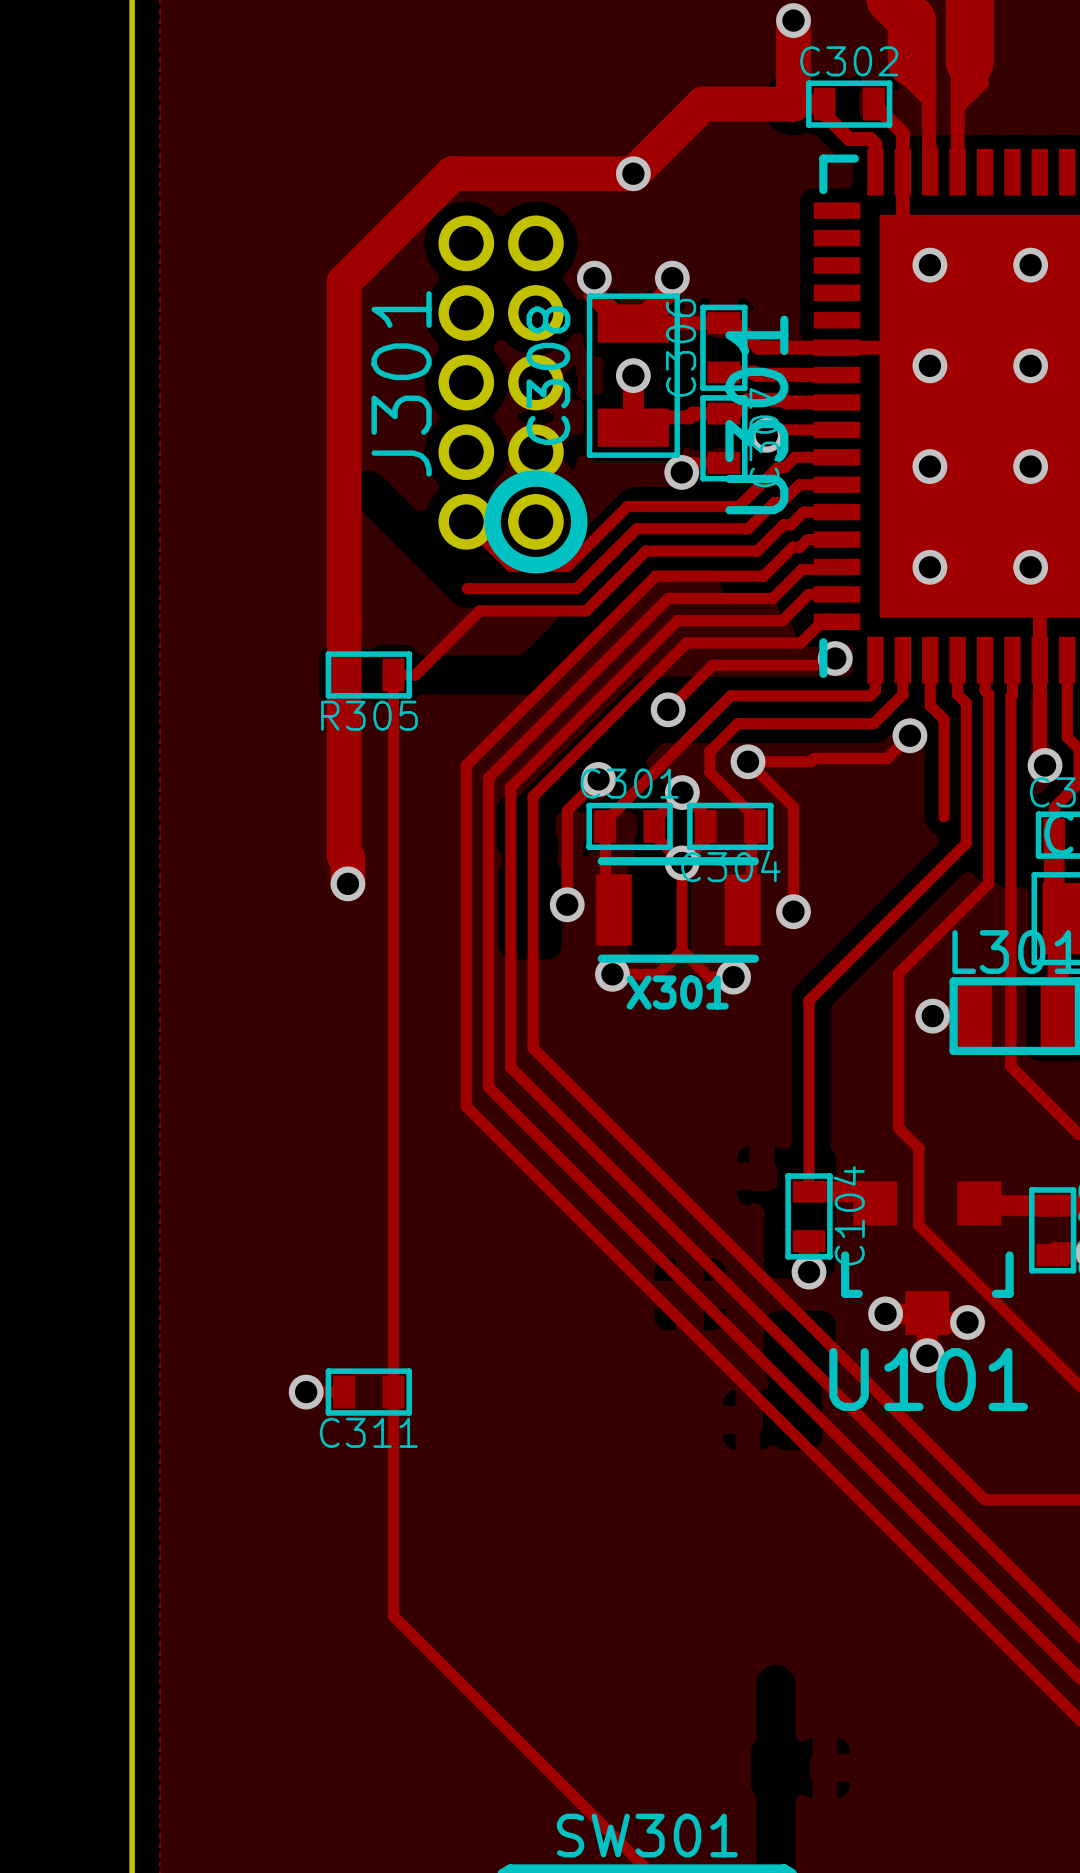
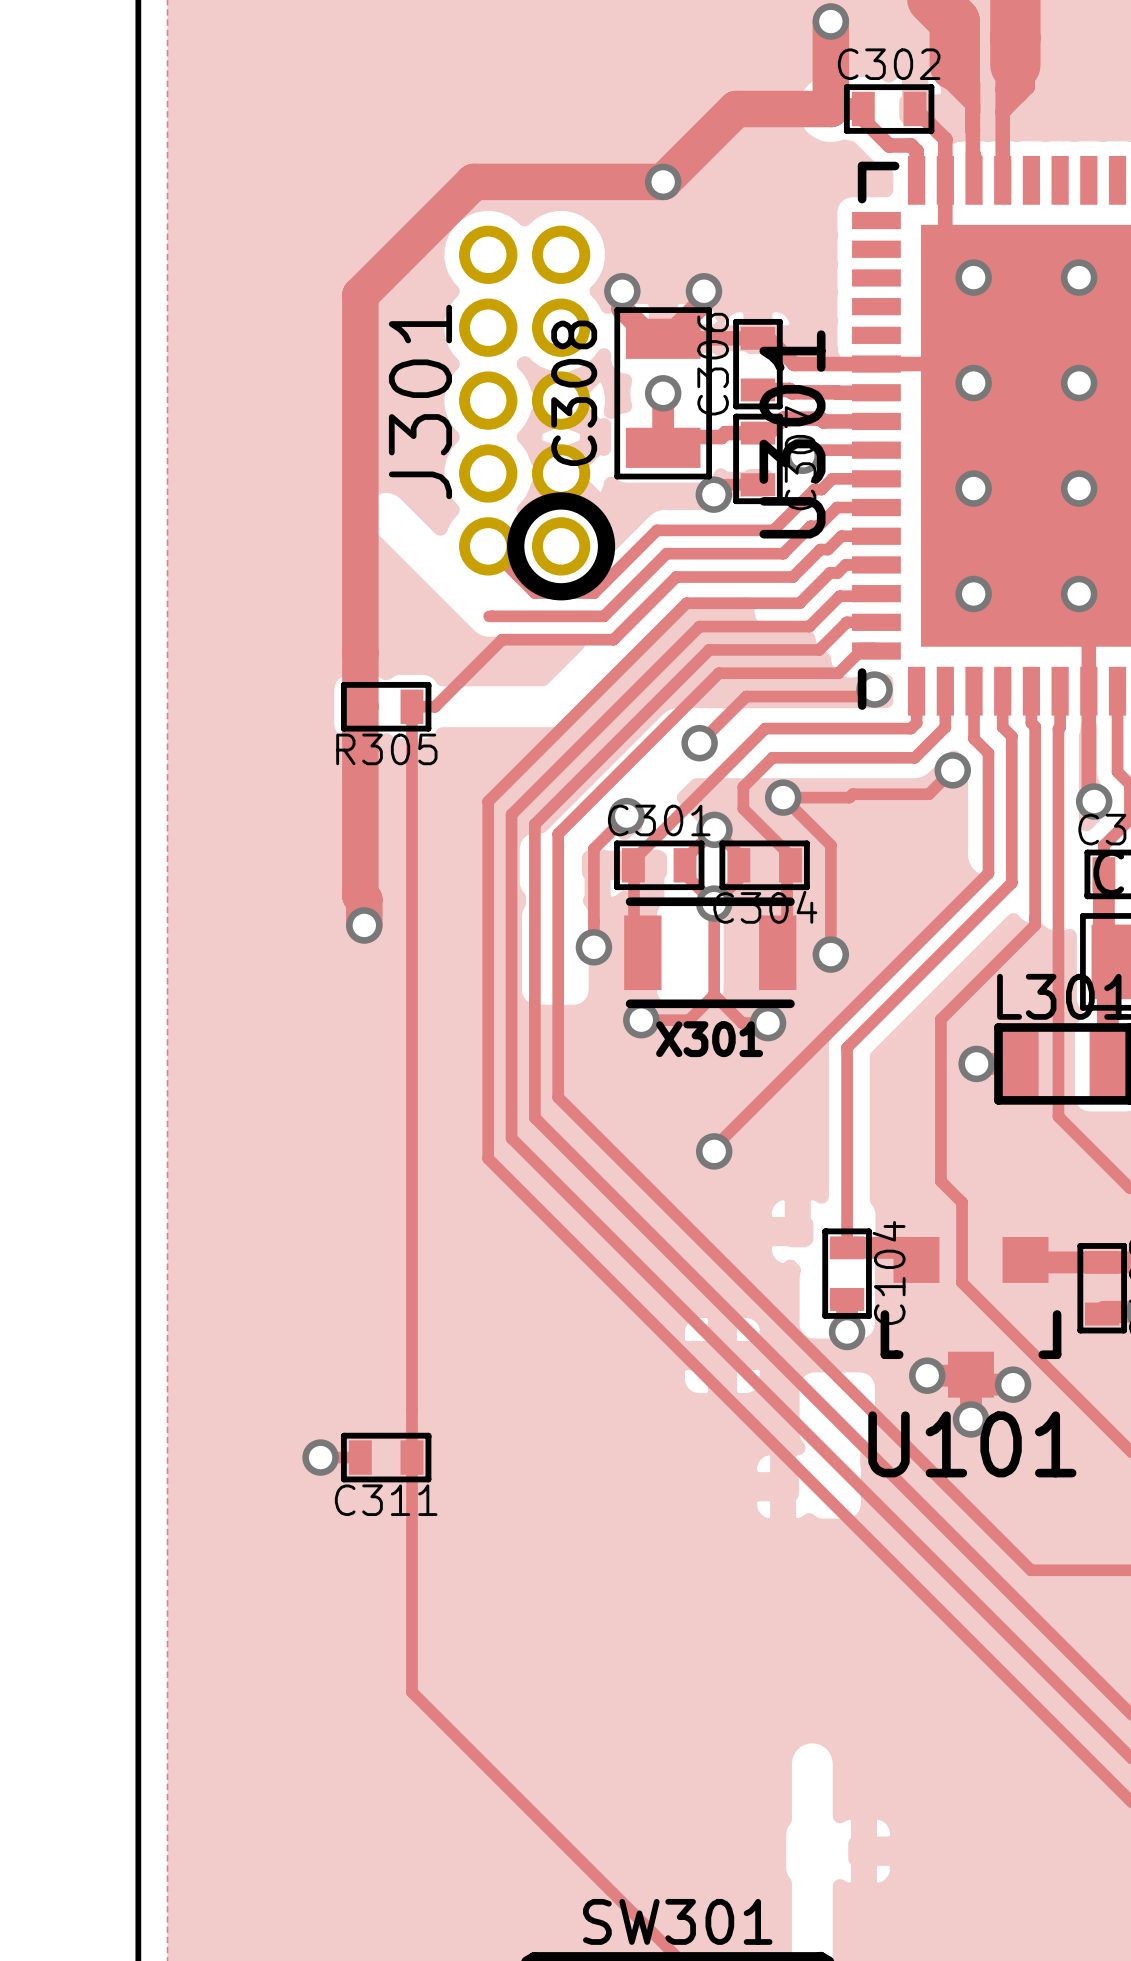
track: none -> (988, 855) (988, 873) (714, 1147) (714, 1151)
via: none -> (714, 1151)

